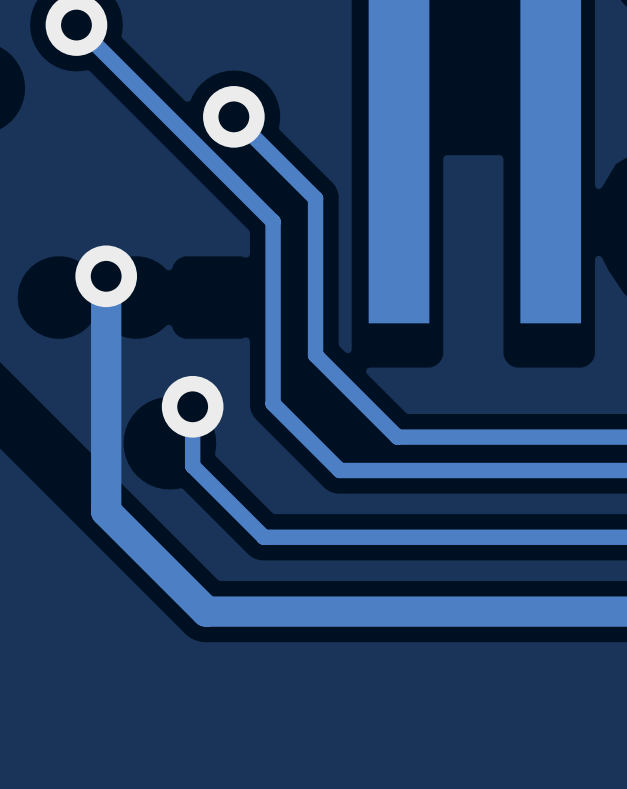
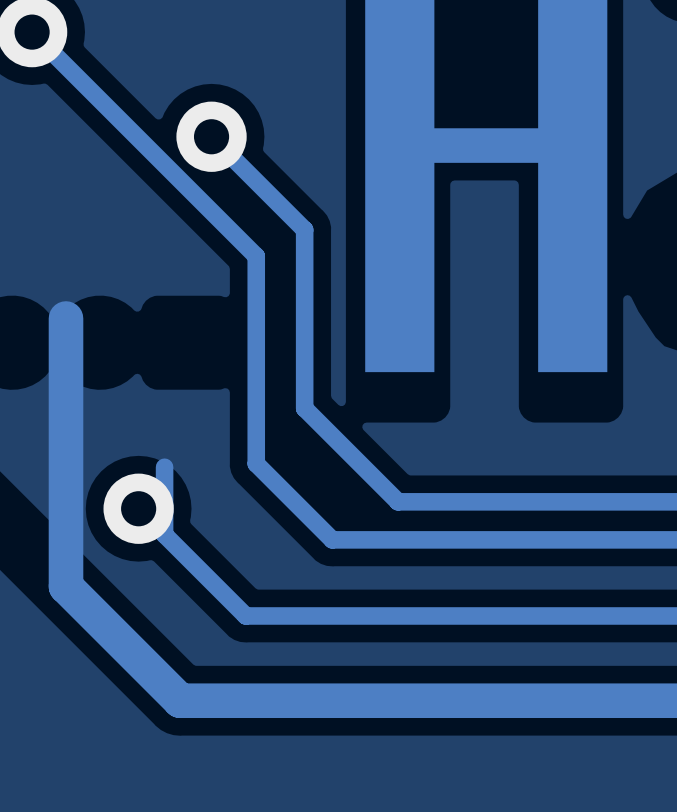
track: none -> (571, 145) (398, 145)
via: (106, 276) -> none
via position: (192, 406) -> (138, 508)

